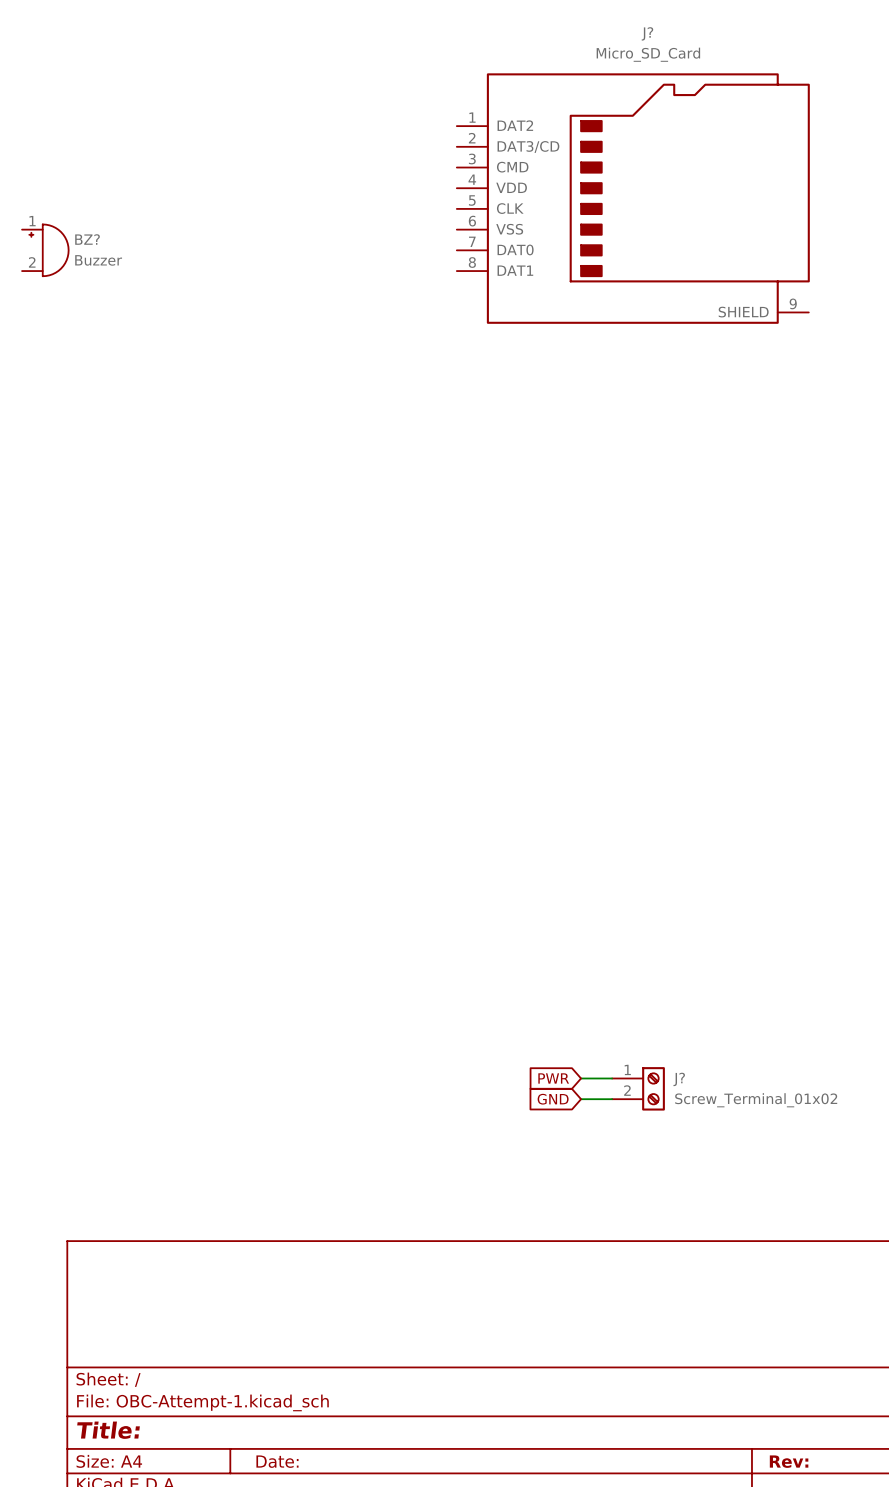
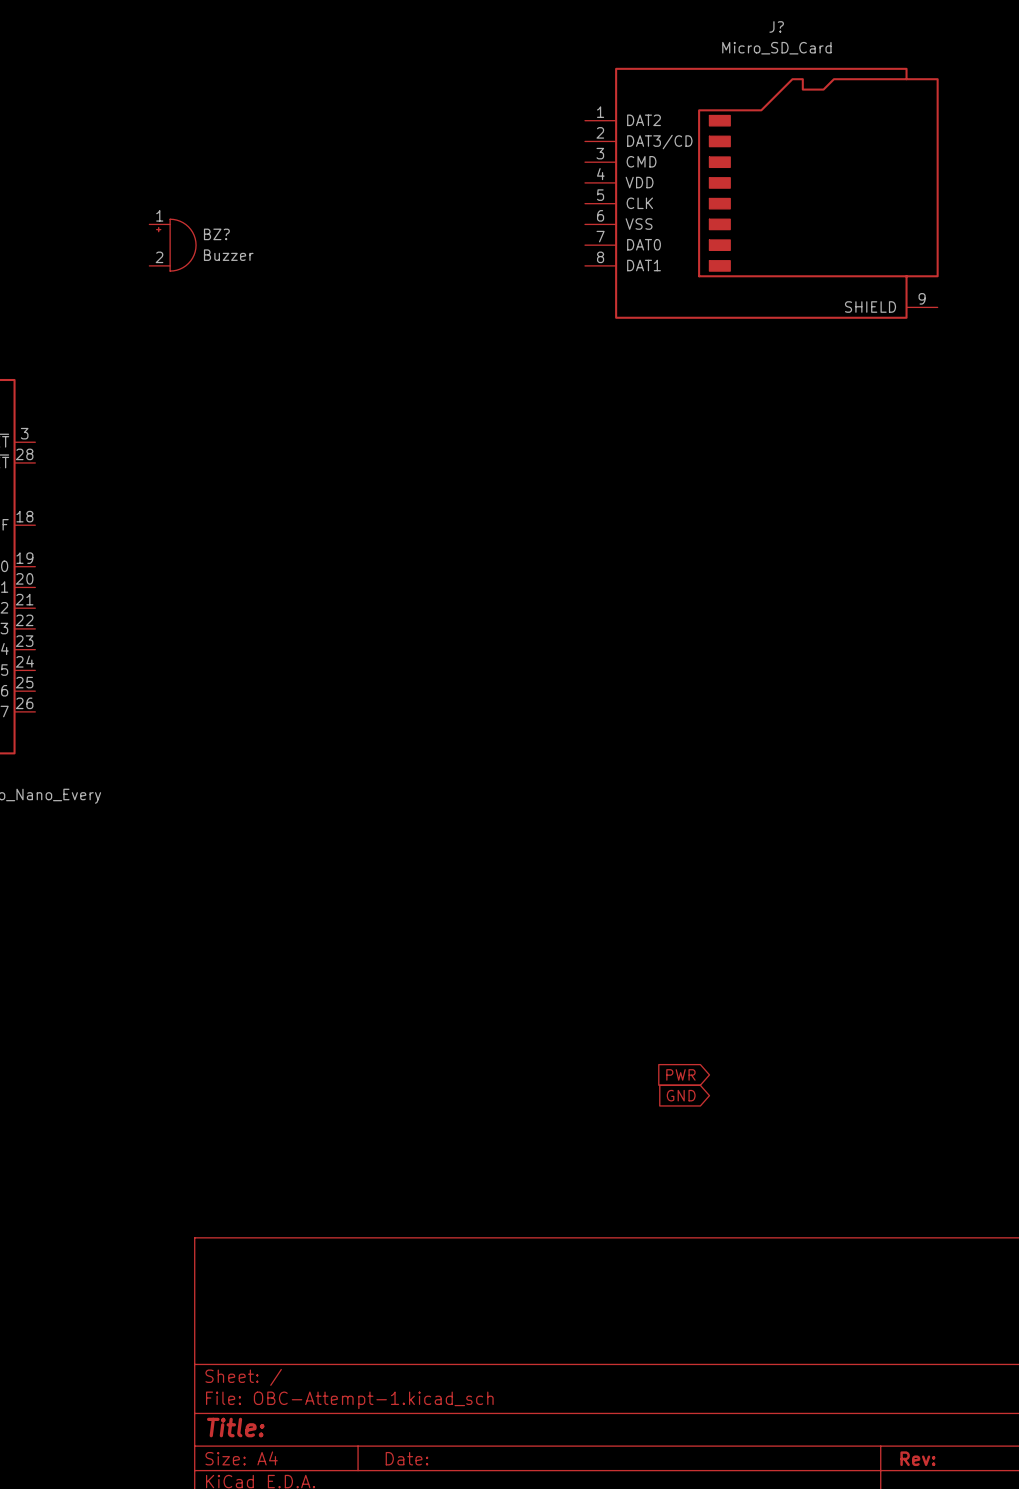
wire: (581, 1078) (612, 1078) -> none
J?: Screw_Terminal_01x02 (638, 1088) -> none
wire: (581, 1099) (612, 1099) -> none

